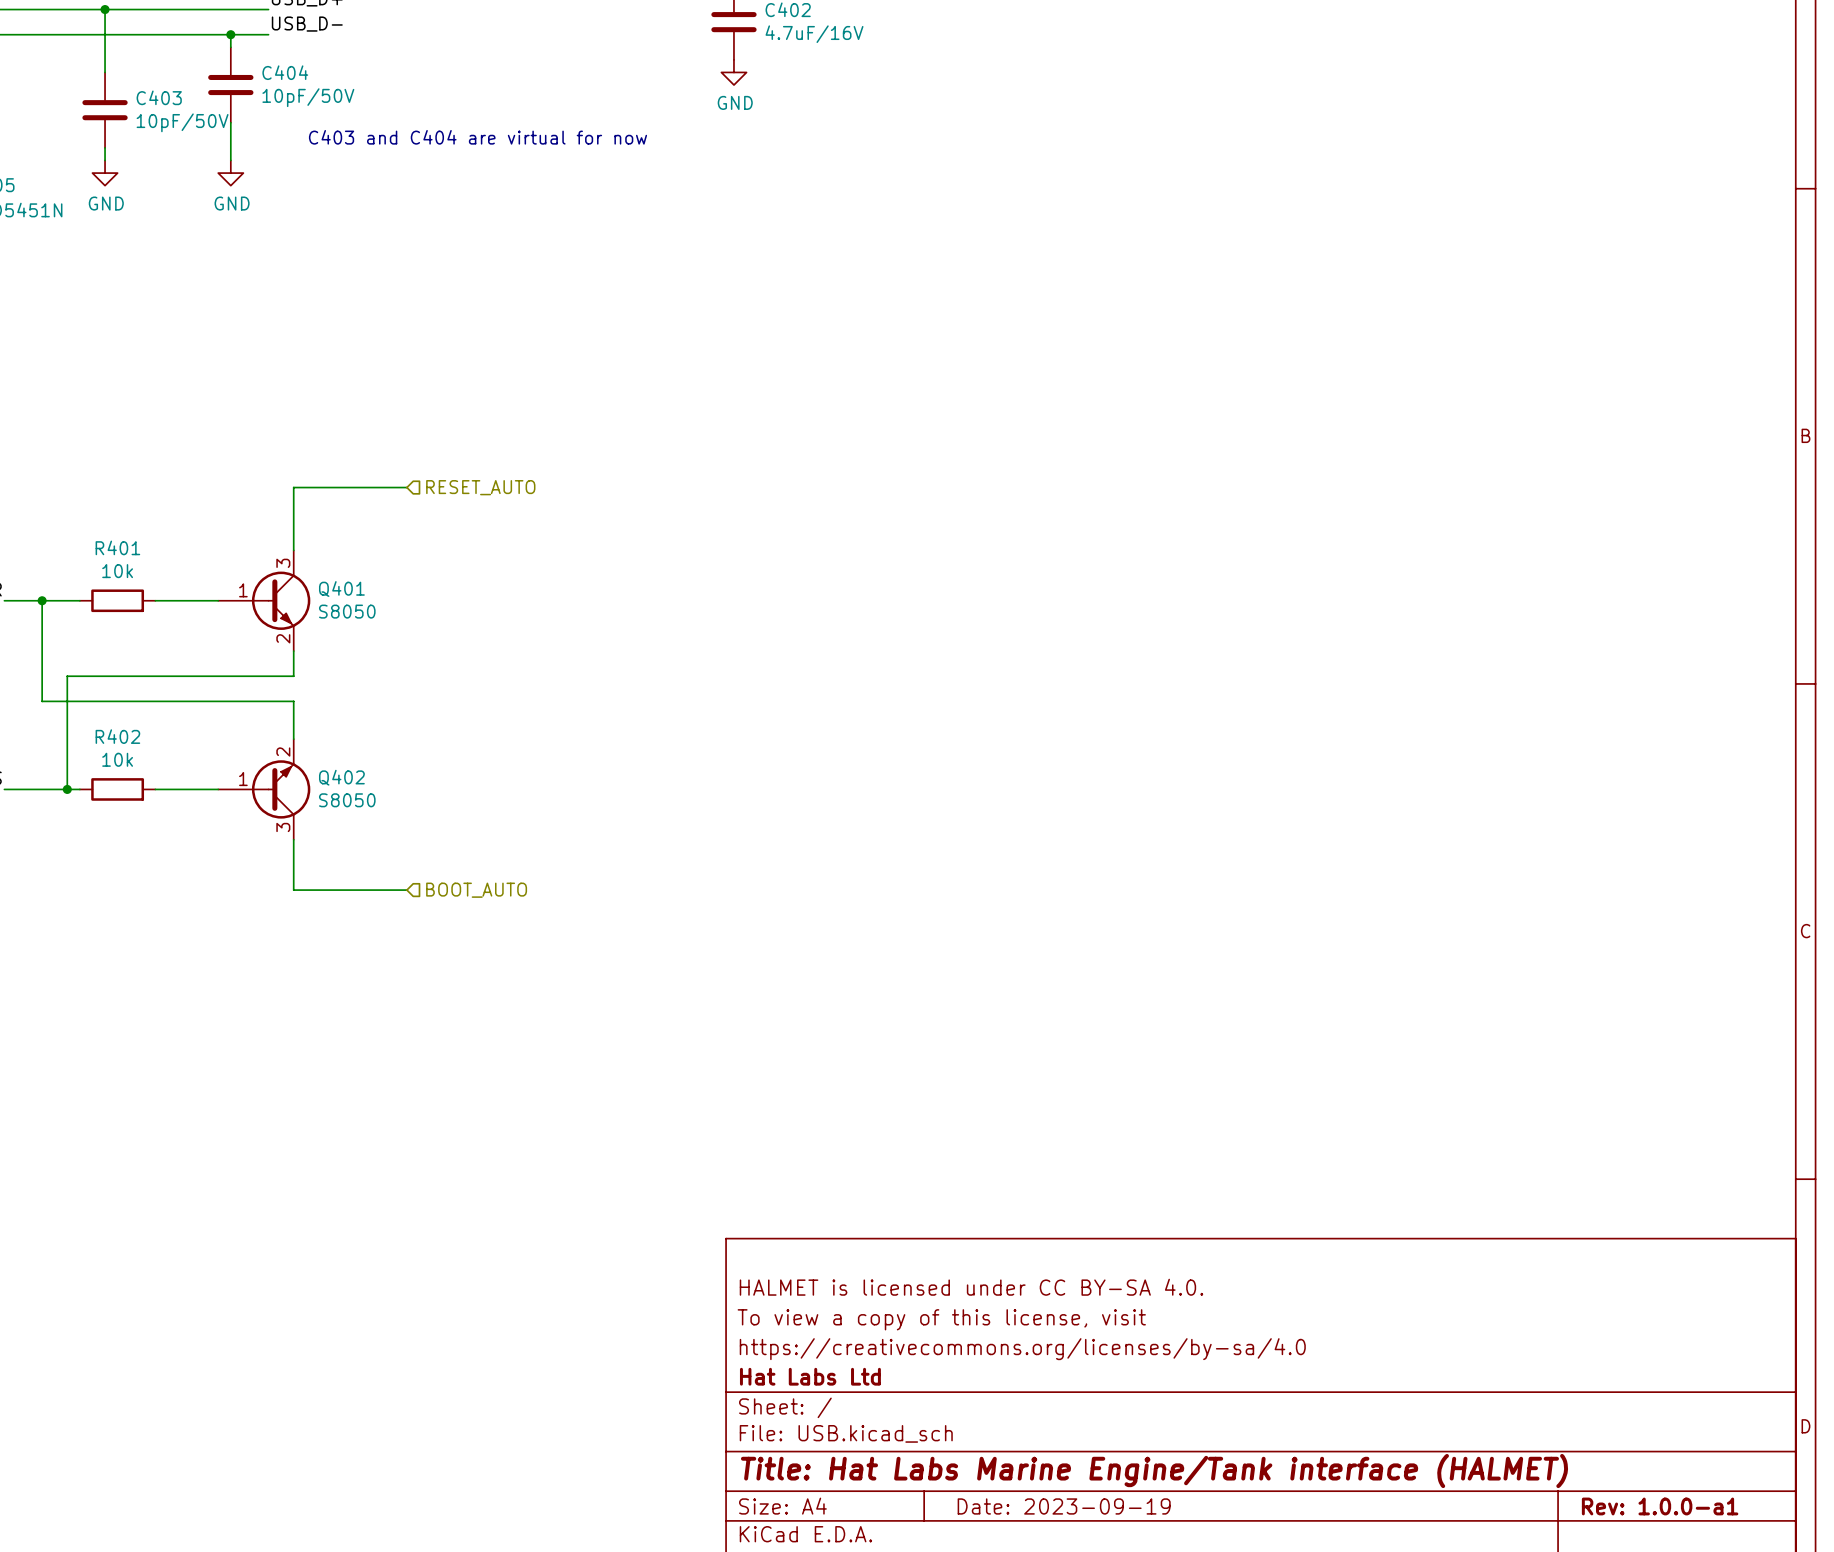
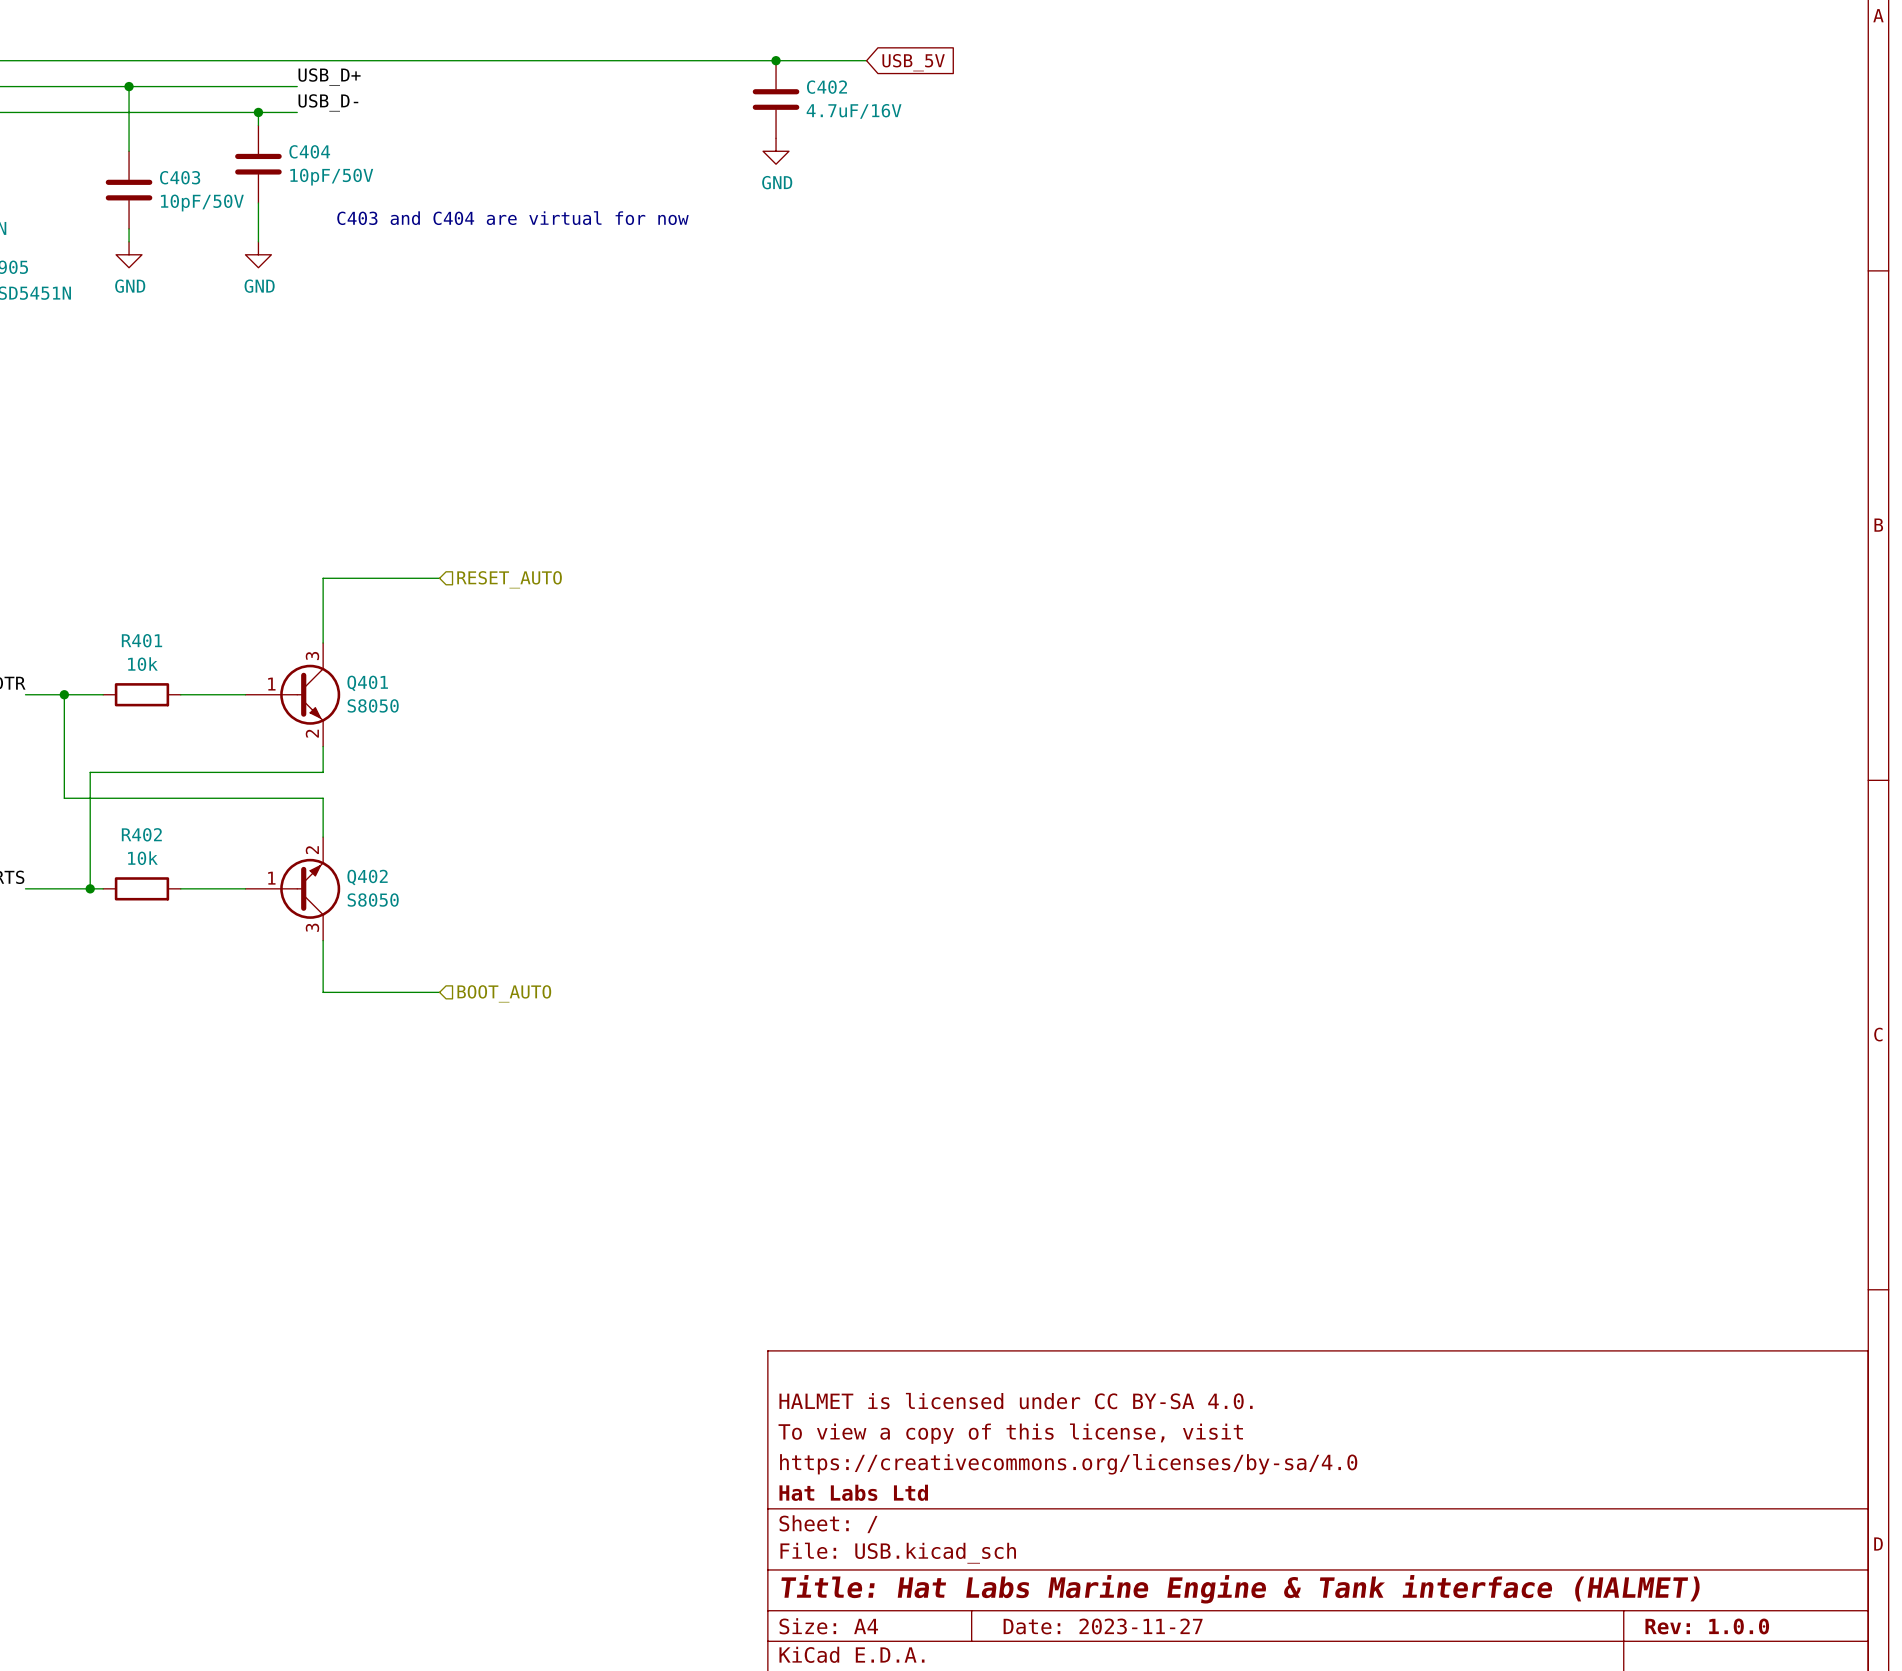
title block: Title: Hat Labs Marine Engine/Tank interface (HALMET) (1154, 1471) -> Title: Hat Labs Marine Engine & Tank interface (HALMET) (1240, 1589)
title block: Date: 2023-09-19 (1064, 1506) -> Date: 2023-11-27 (1103, 1626)
title block: Rev: 1.0.0-a1 (1660, 1506) -> Rev: 1.0.0 (1707, 1626)

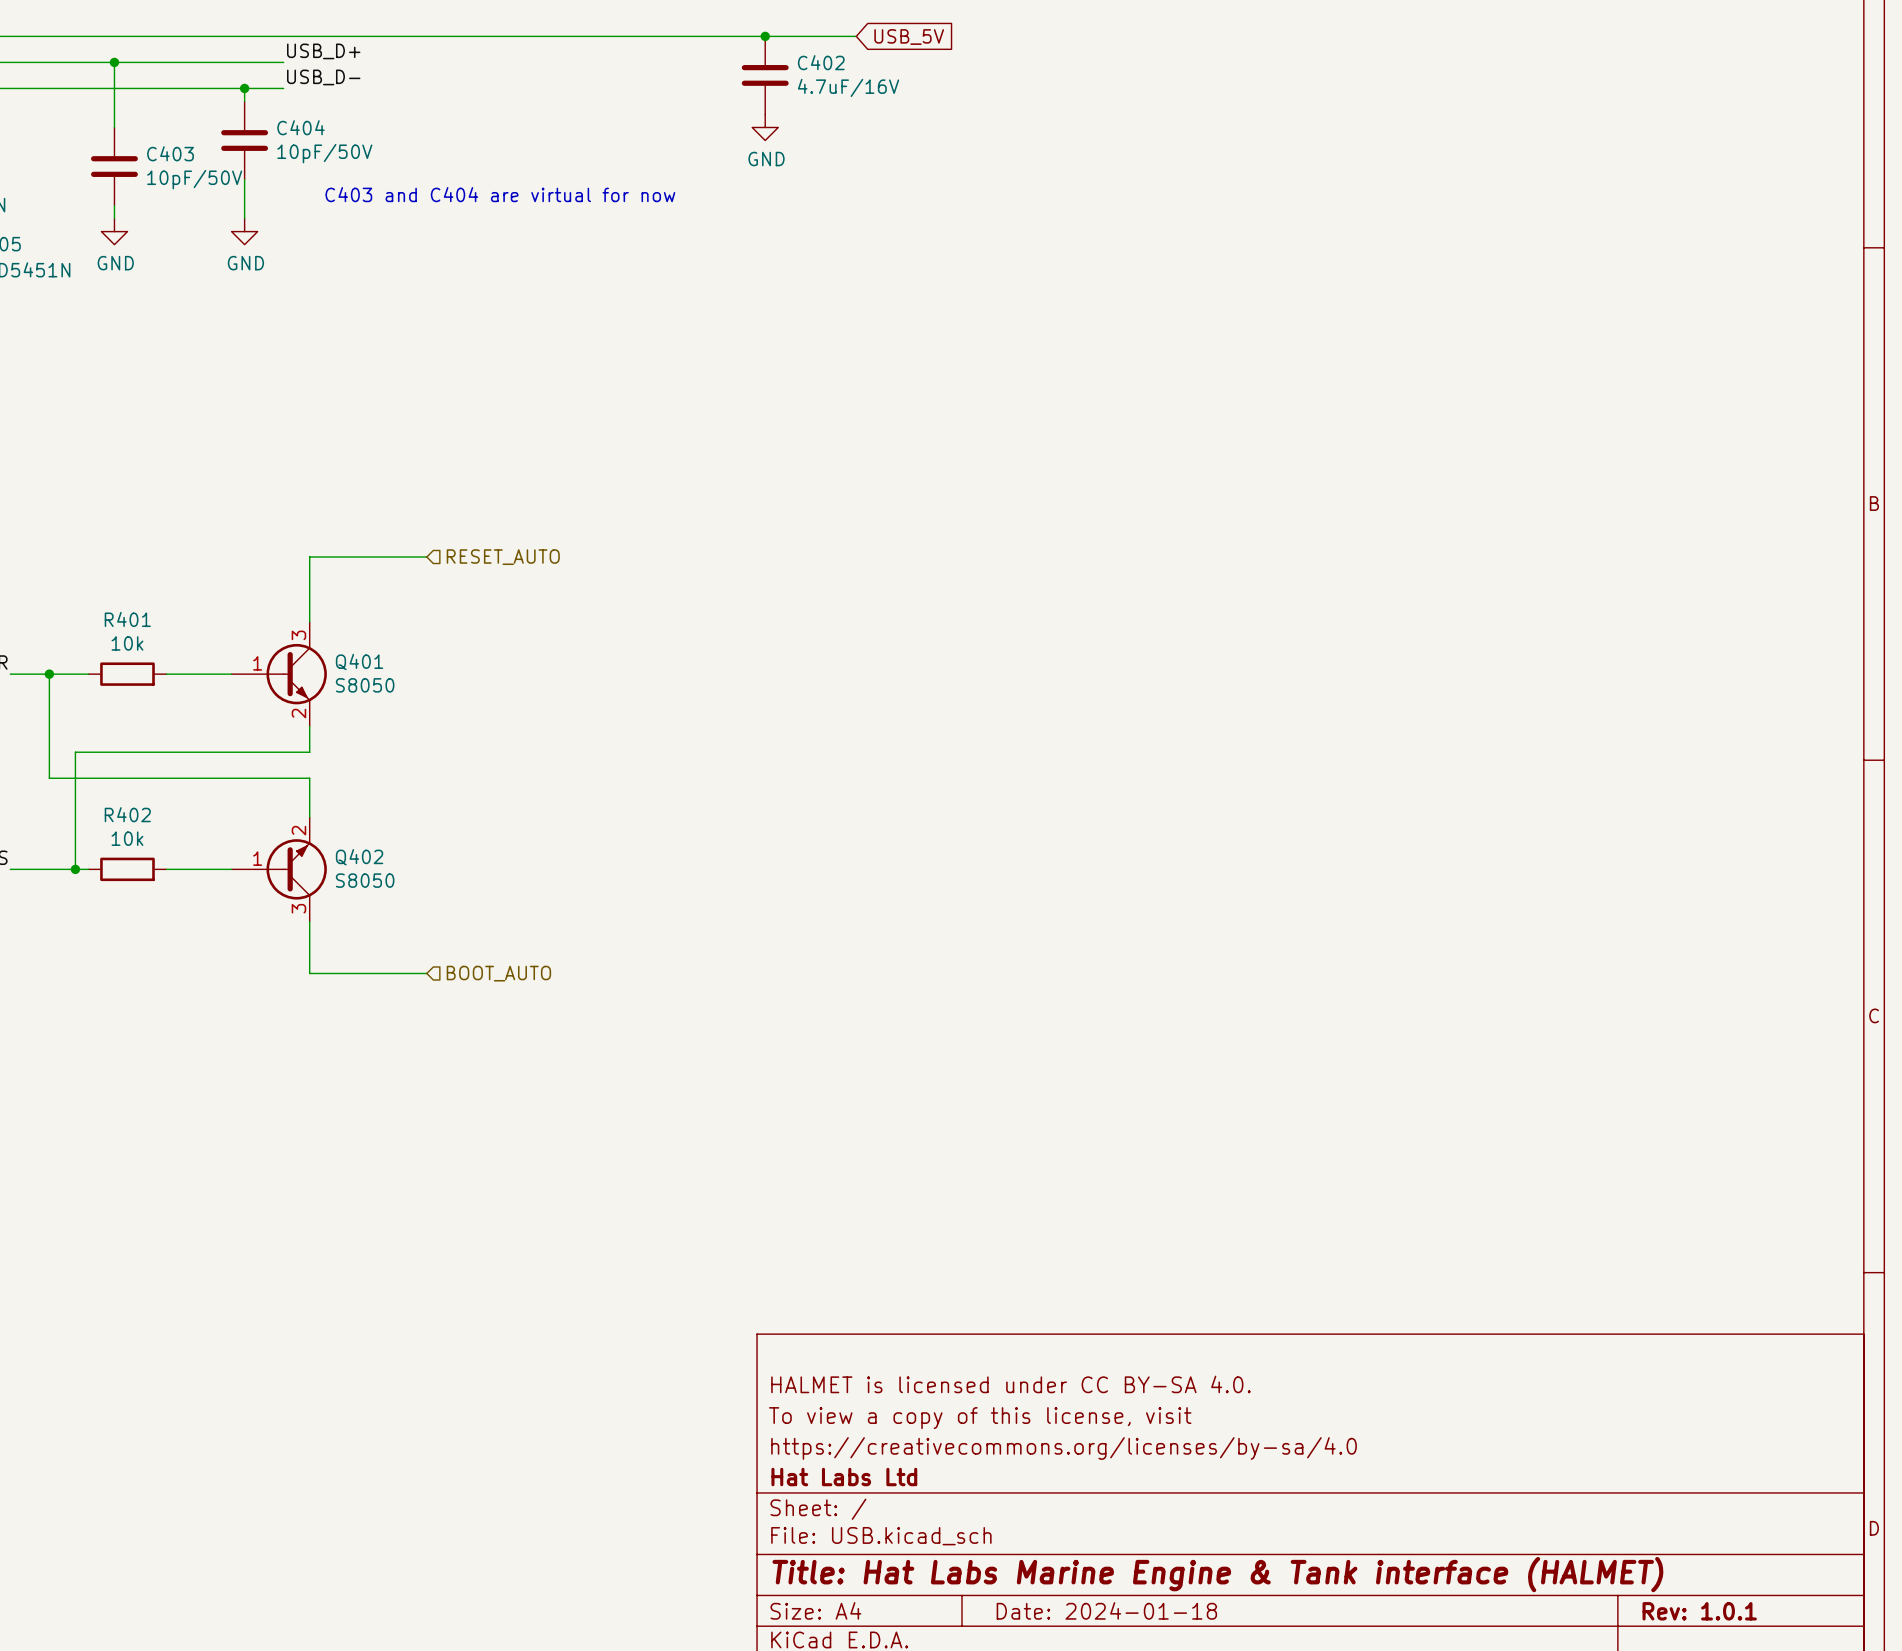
title block: Date: 2023-11-27 (1103, 1626) -> Date: 2024-01-18 (1106, 1610)
title block: Rev: 1.0.0 (1707, 1626) -> Rev: 1.0.1 (1699, 1611)

